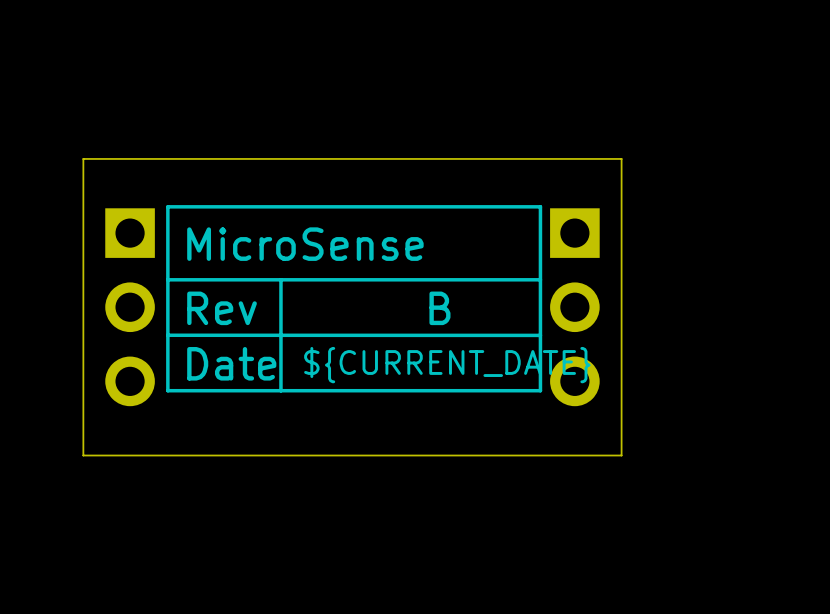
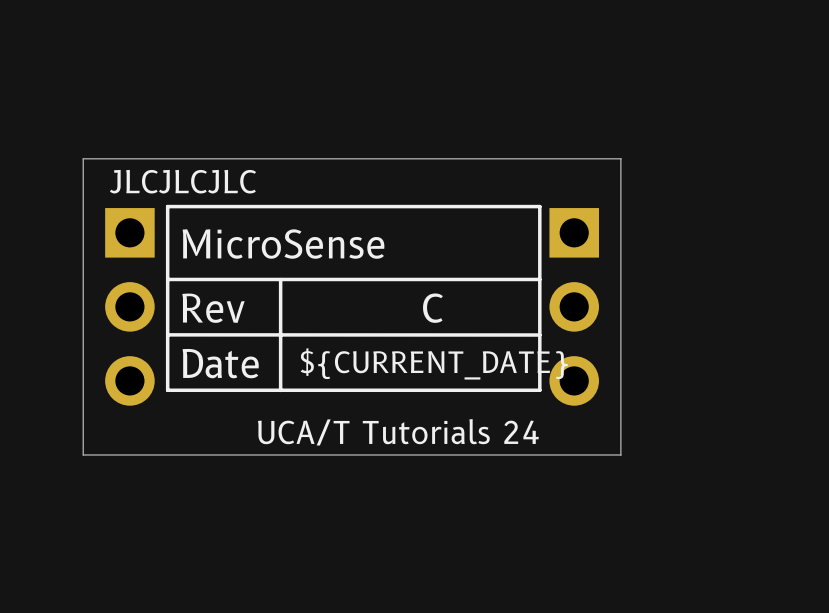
text: none -> JLCJLCJLC (182, 181)
text: B (439, 308) -> C (432, 308)
text: none -> UCA/T Tutorials 24 (398, 432)

